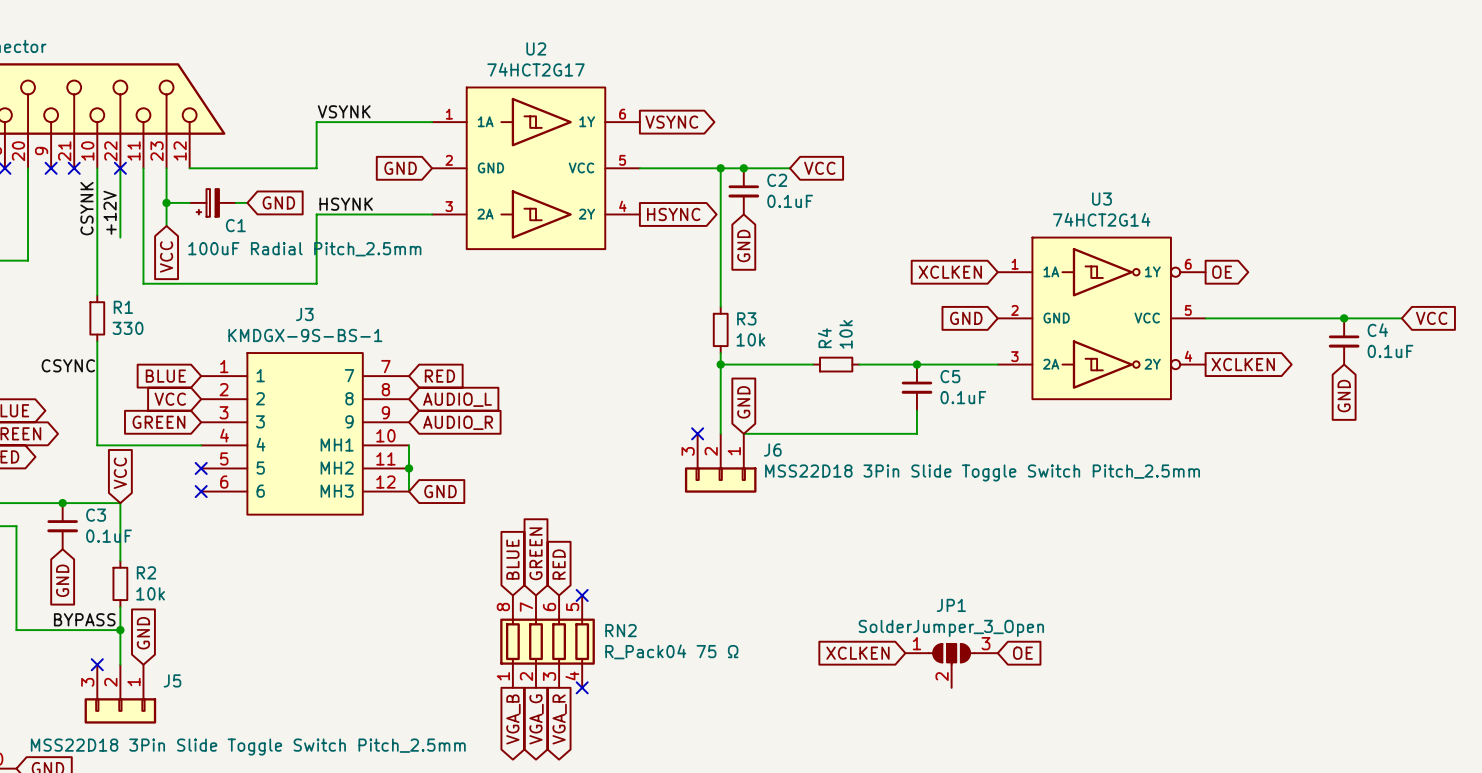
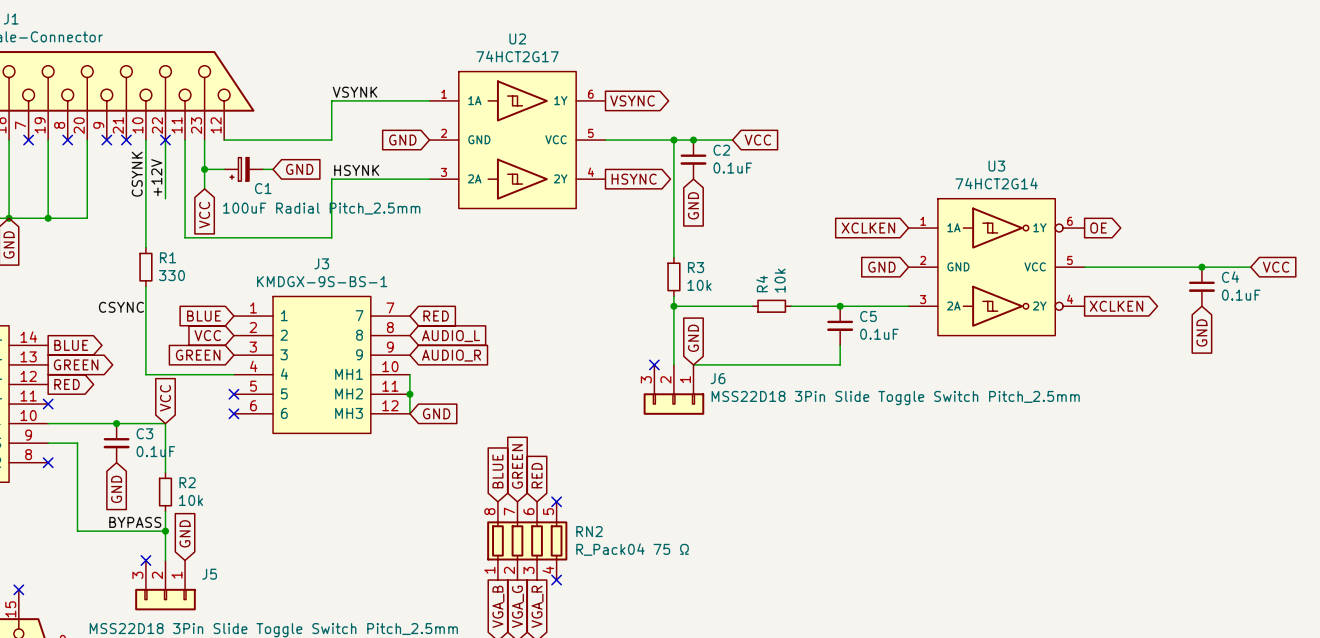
global label: XCLKEN (857, 653) -> none
global label: OE (1022, 653) -> none
JP1: SolderJumper_3_Open (951, 665) -> none

